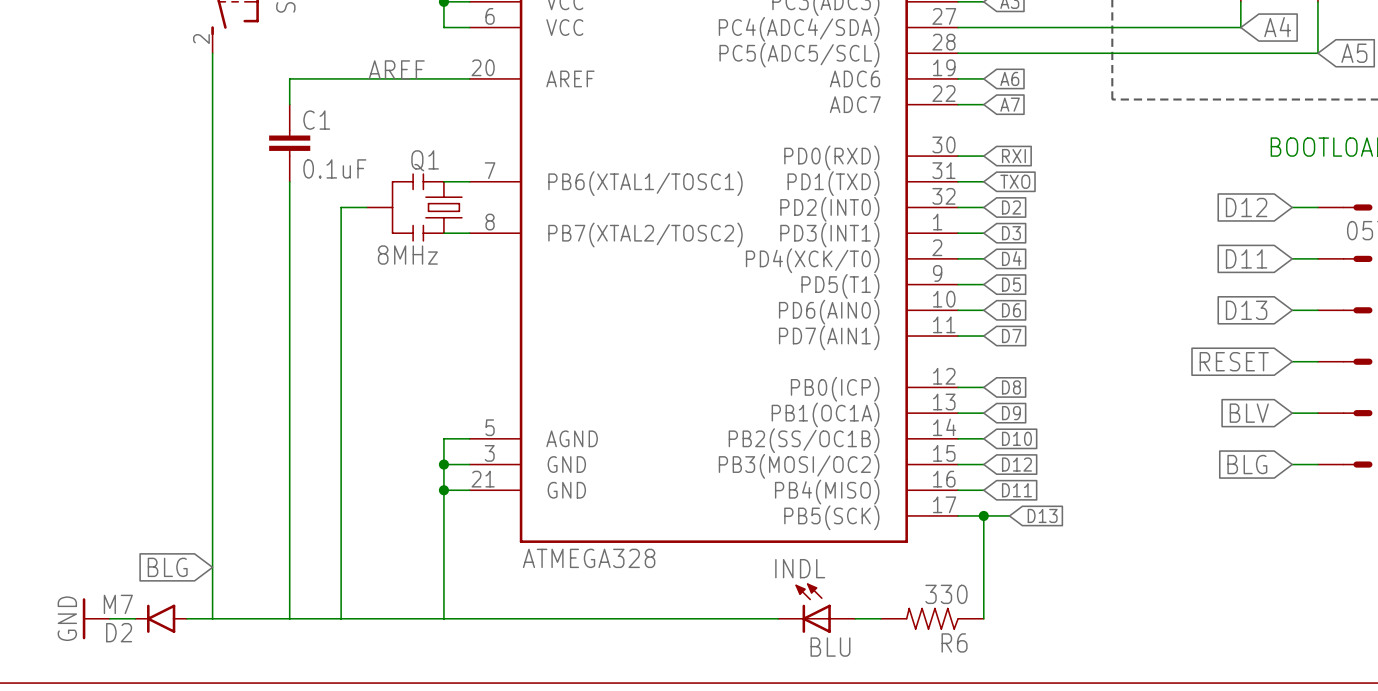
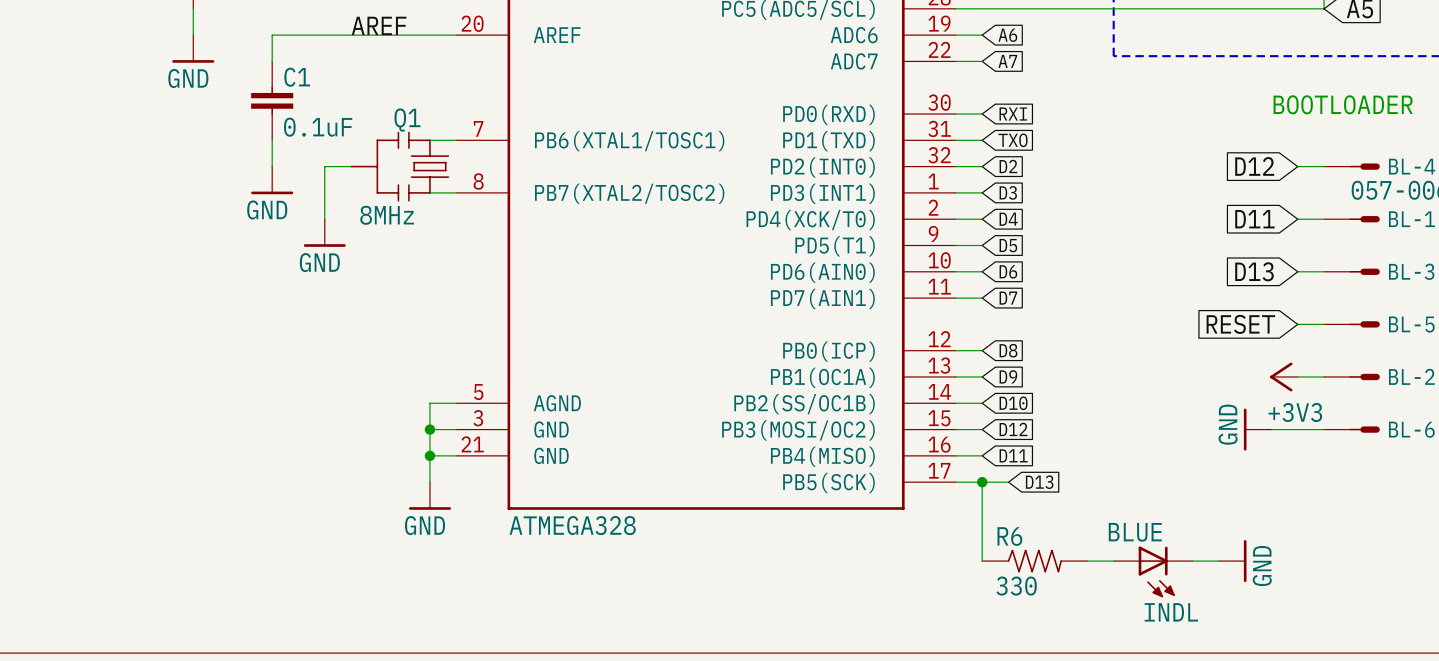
wire: (212, 78) (212, 618) -> none
power symbol: none -> GND (193, 48)
wire: (289, 207) (289, 618) -> none
power symbol: none -> GND (272, 180)
wire: (341, 258) (341, 618) -> none
power symbol: none -> GND (324, 233)
global label: BLV (1249, 413) -> none
power symbol: none -> +3V3 (1283, 376)
global label: BLG (1247, 464) -> none
power symbol: none -> GND (1257, 429)
wire: none -> (1271, 429) (1297, 429)
wire: (443, 515) (443, 618) -> none
power symbol: none -> GND (429, 495)
global label: BLG (167, 567) -> none
wire: (983, 593) (983, 618) -> none
wire: none -> (1192, 561) (1218, 561)
power symbol: none -> GND (1232, 561)
INDL: none -> BLUE (1153, 571)
INDL: BLU (816, 608) -> none
power symbol: GND (96, 618) -> none
wire: (109, 618) (135, 618) -> none
D2: M7 (161, 618) -> none
wire: (186, 618) (778, 618) -> none
wire: (855, 618) (880, 618) -> (1087, 561) (1113, 561)
R6 rotation: 0° (932, 618) -> 180° (1034, 561)
R6 position: (932, 618) -> (1034, 561)

